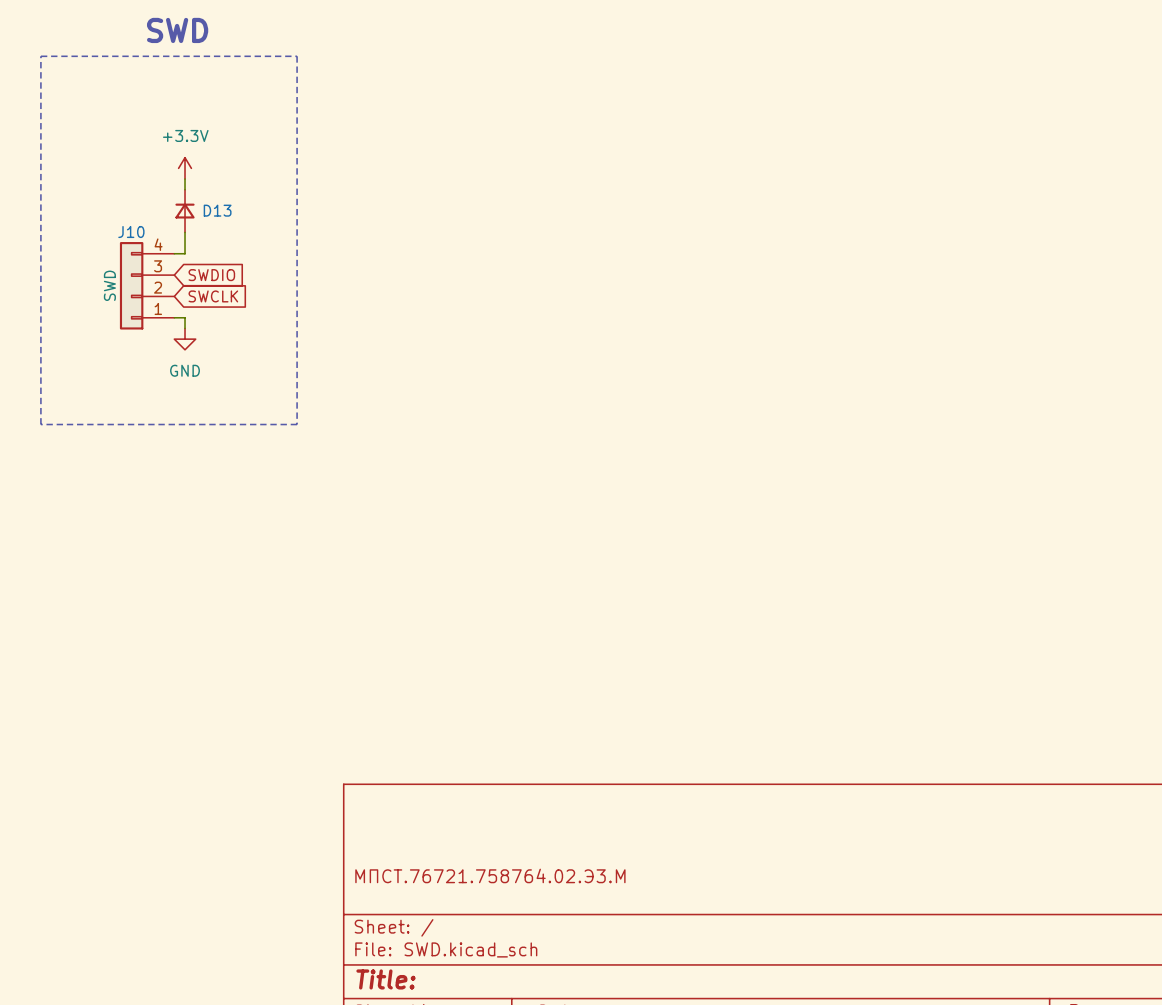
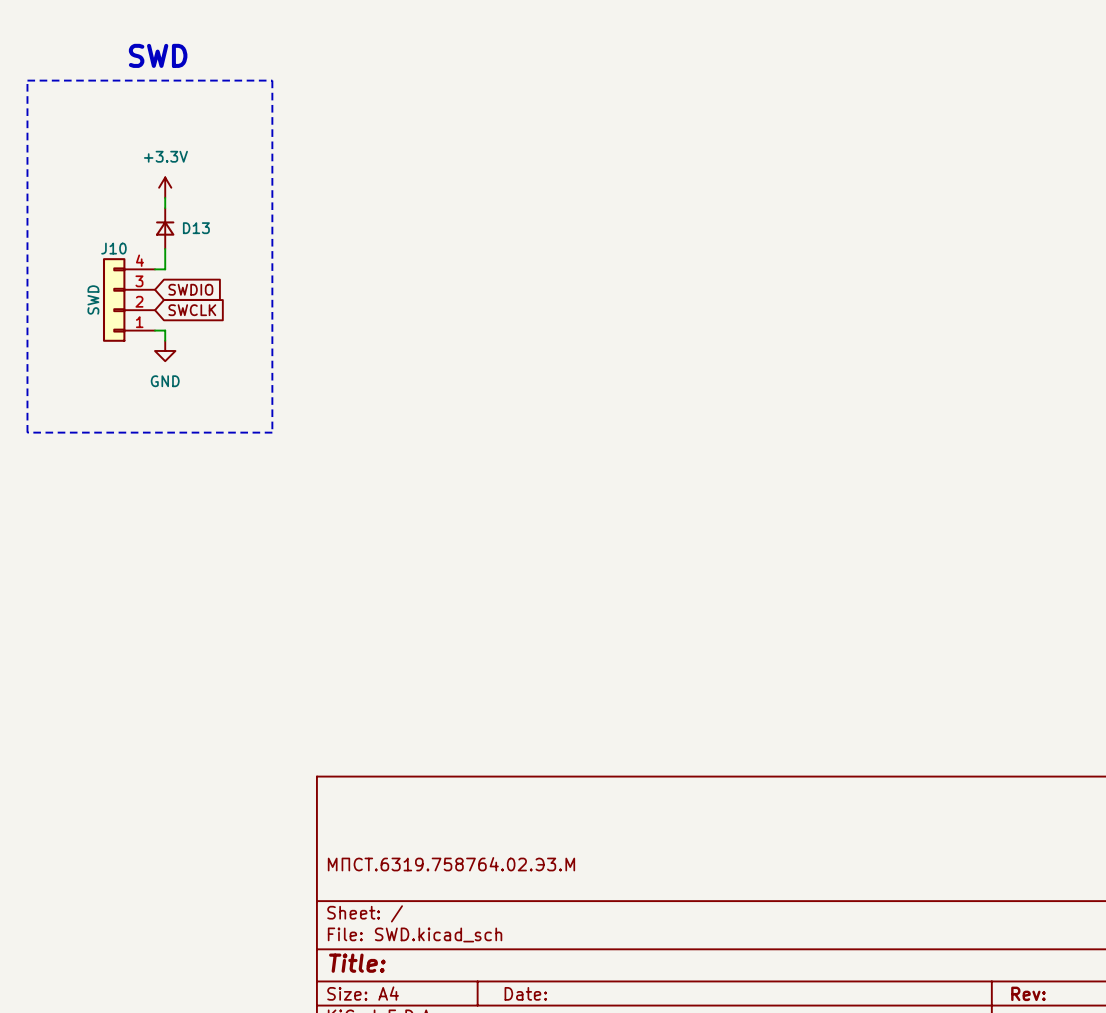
title block: МПСТ.76721.758764.02.Э3.М (490, 875) -> МПСТ.6319.758764.02.Э3.М (451, 864)

